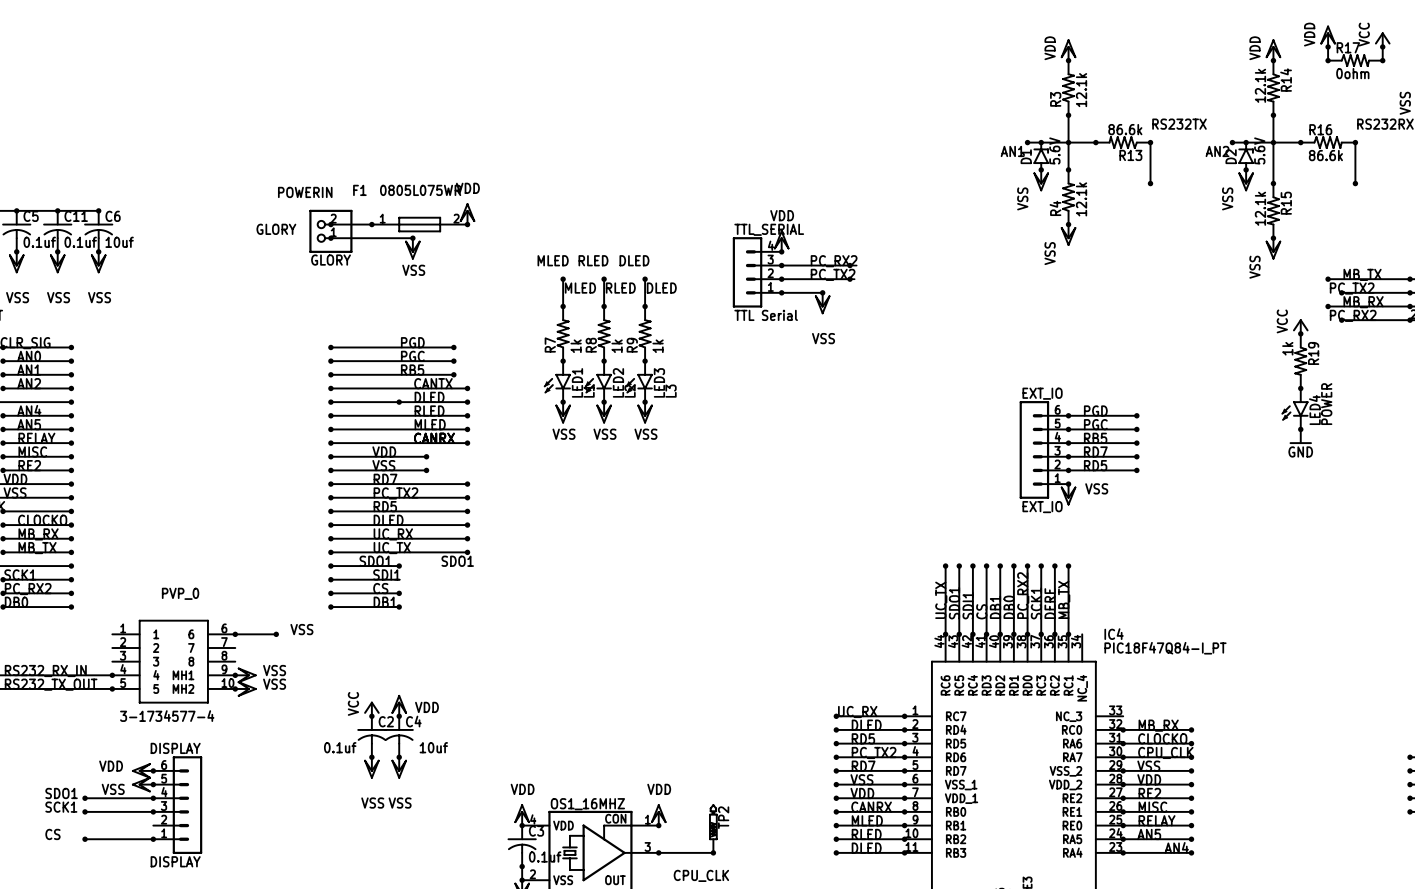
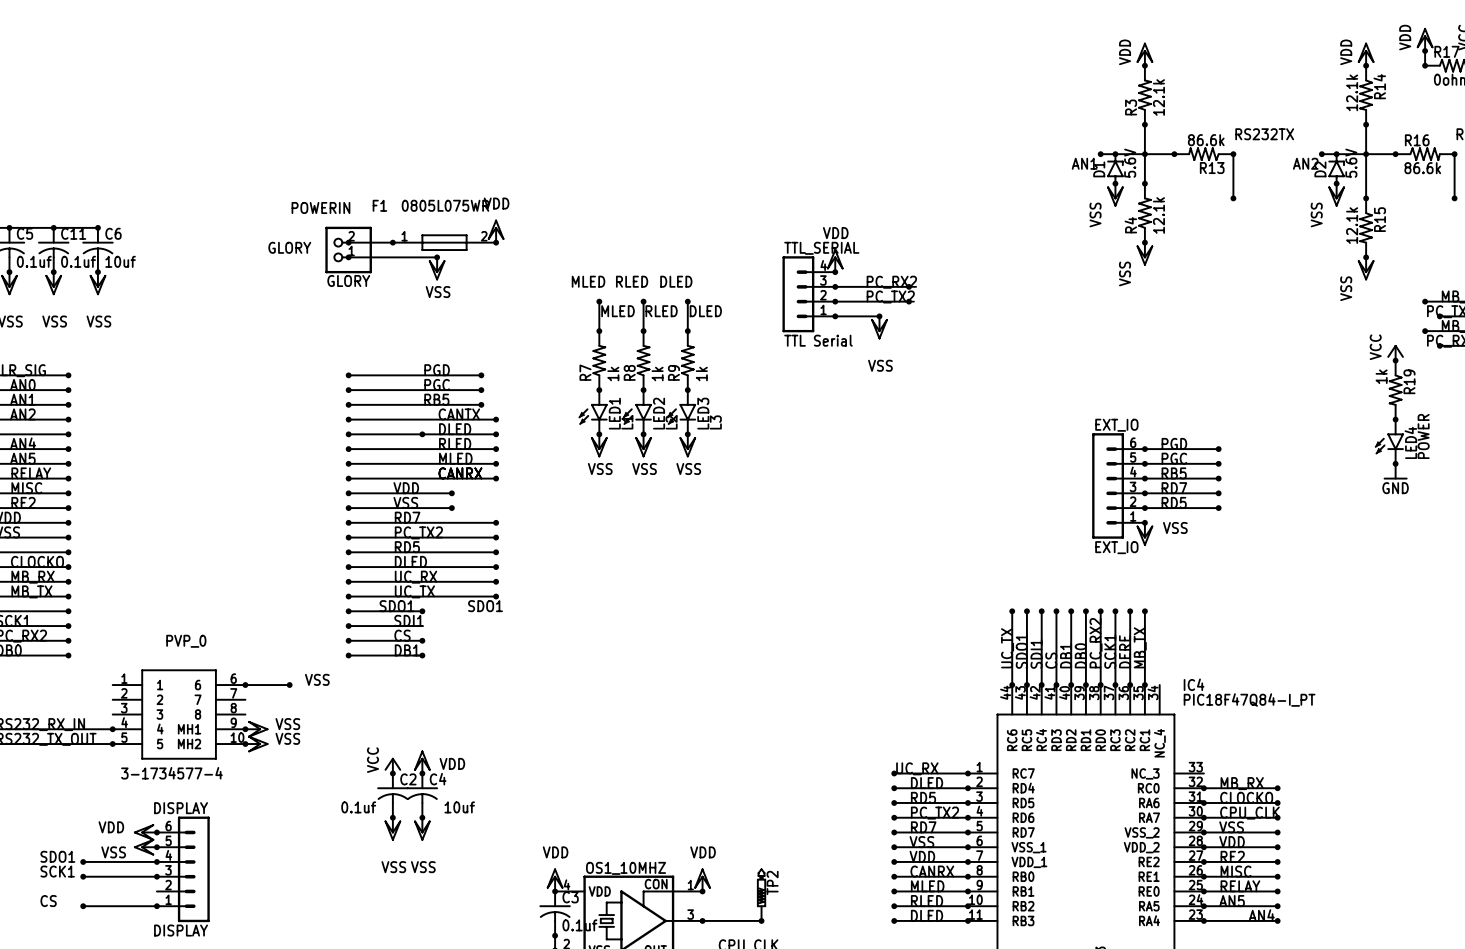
OS1_16MHZ name: OS1_16MHZ (587, 804) -> OS1_10MHZ (626, 868)

